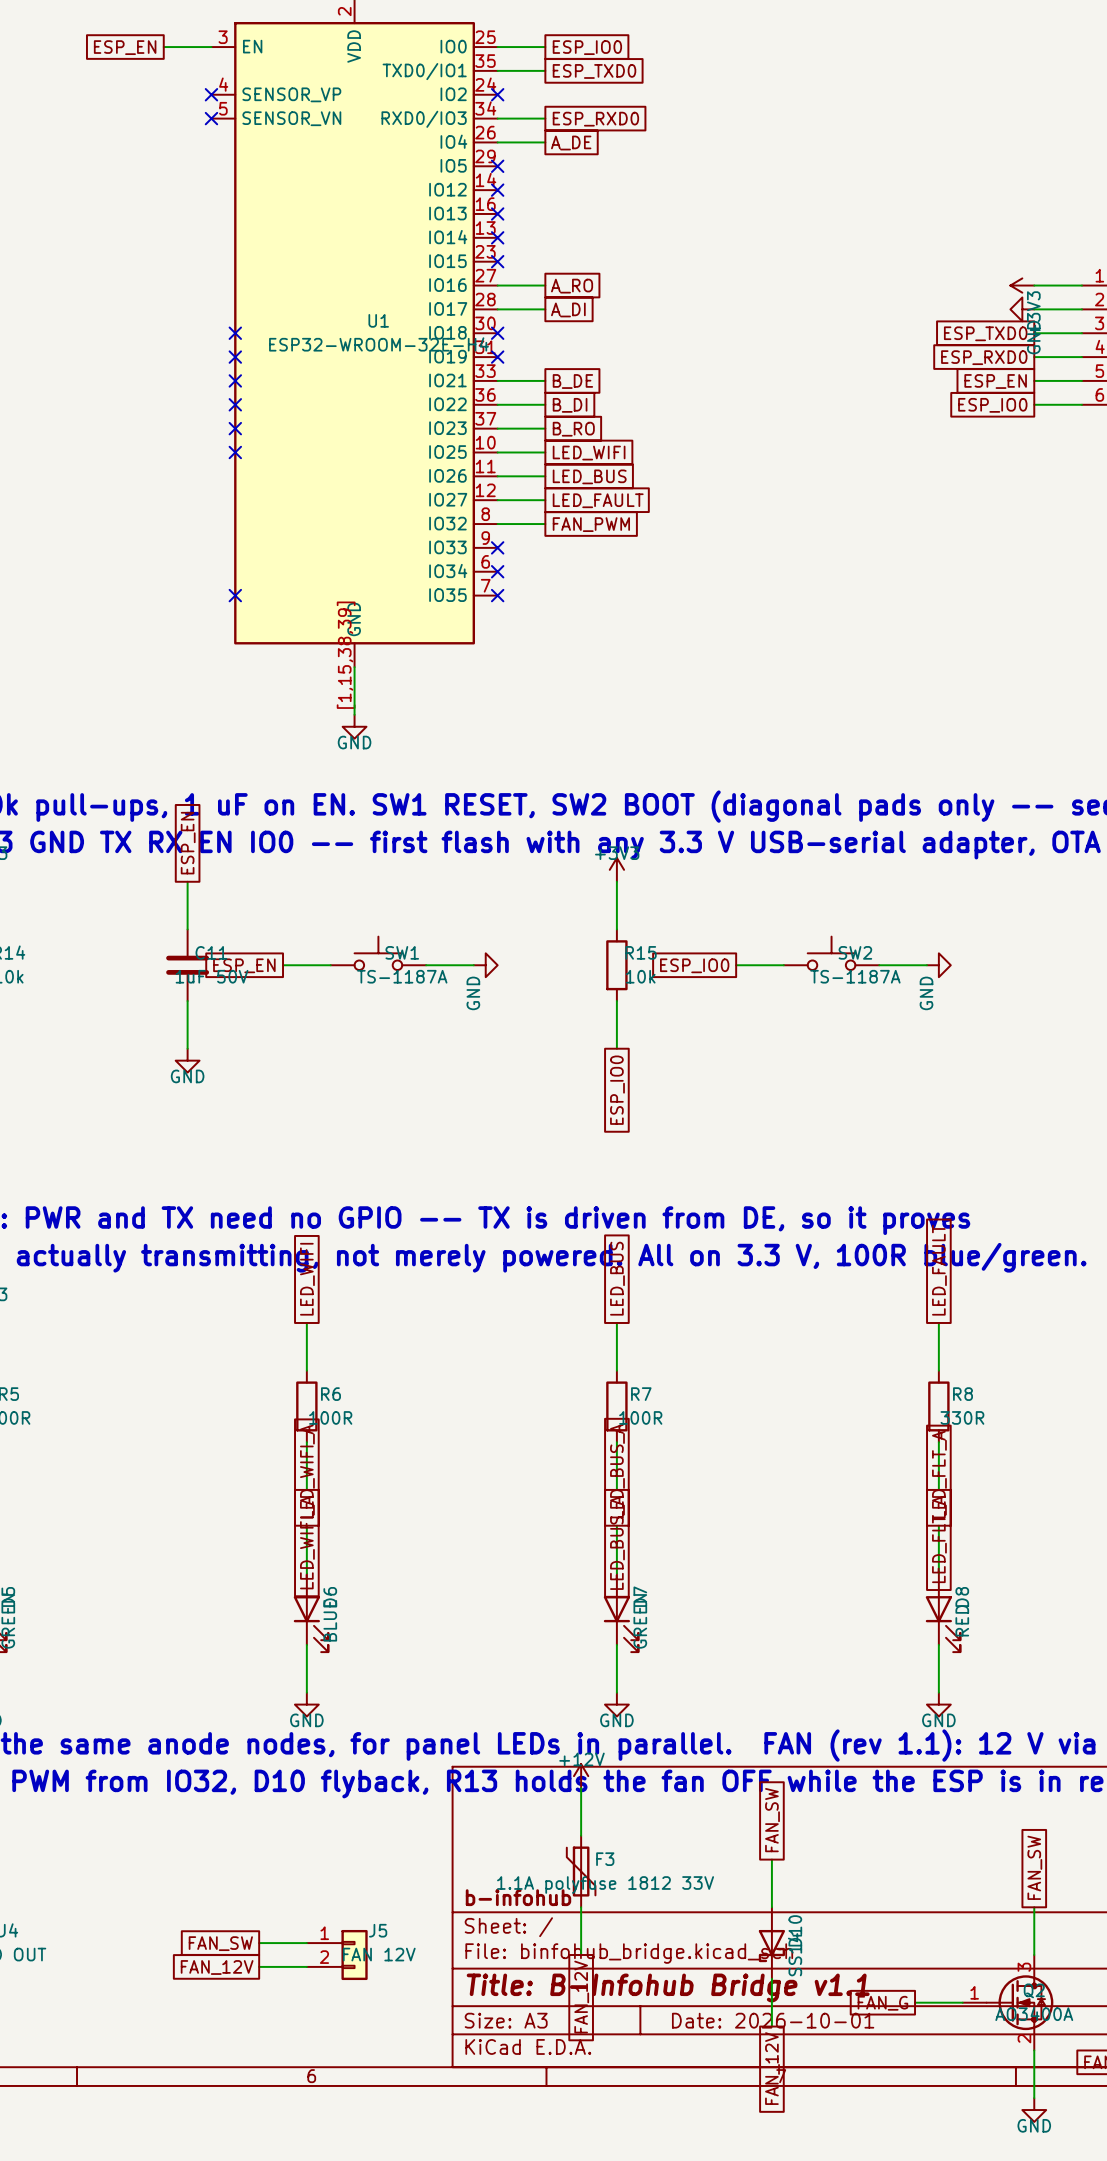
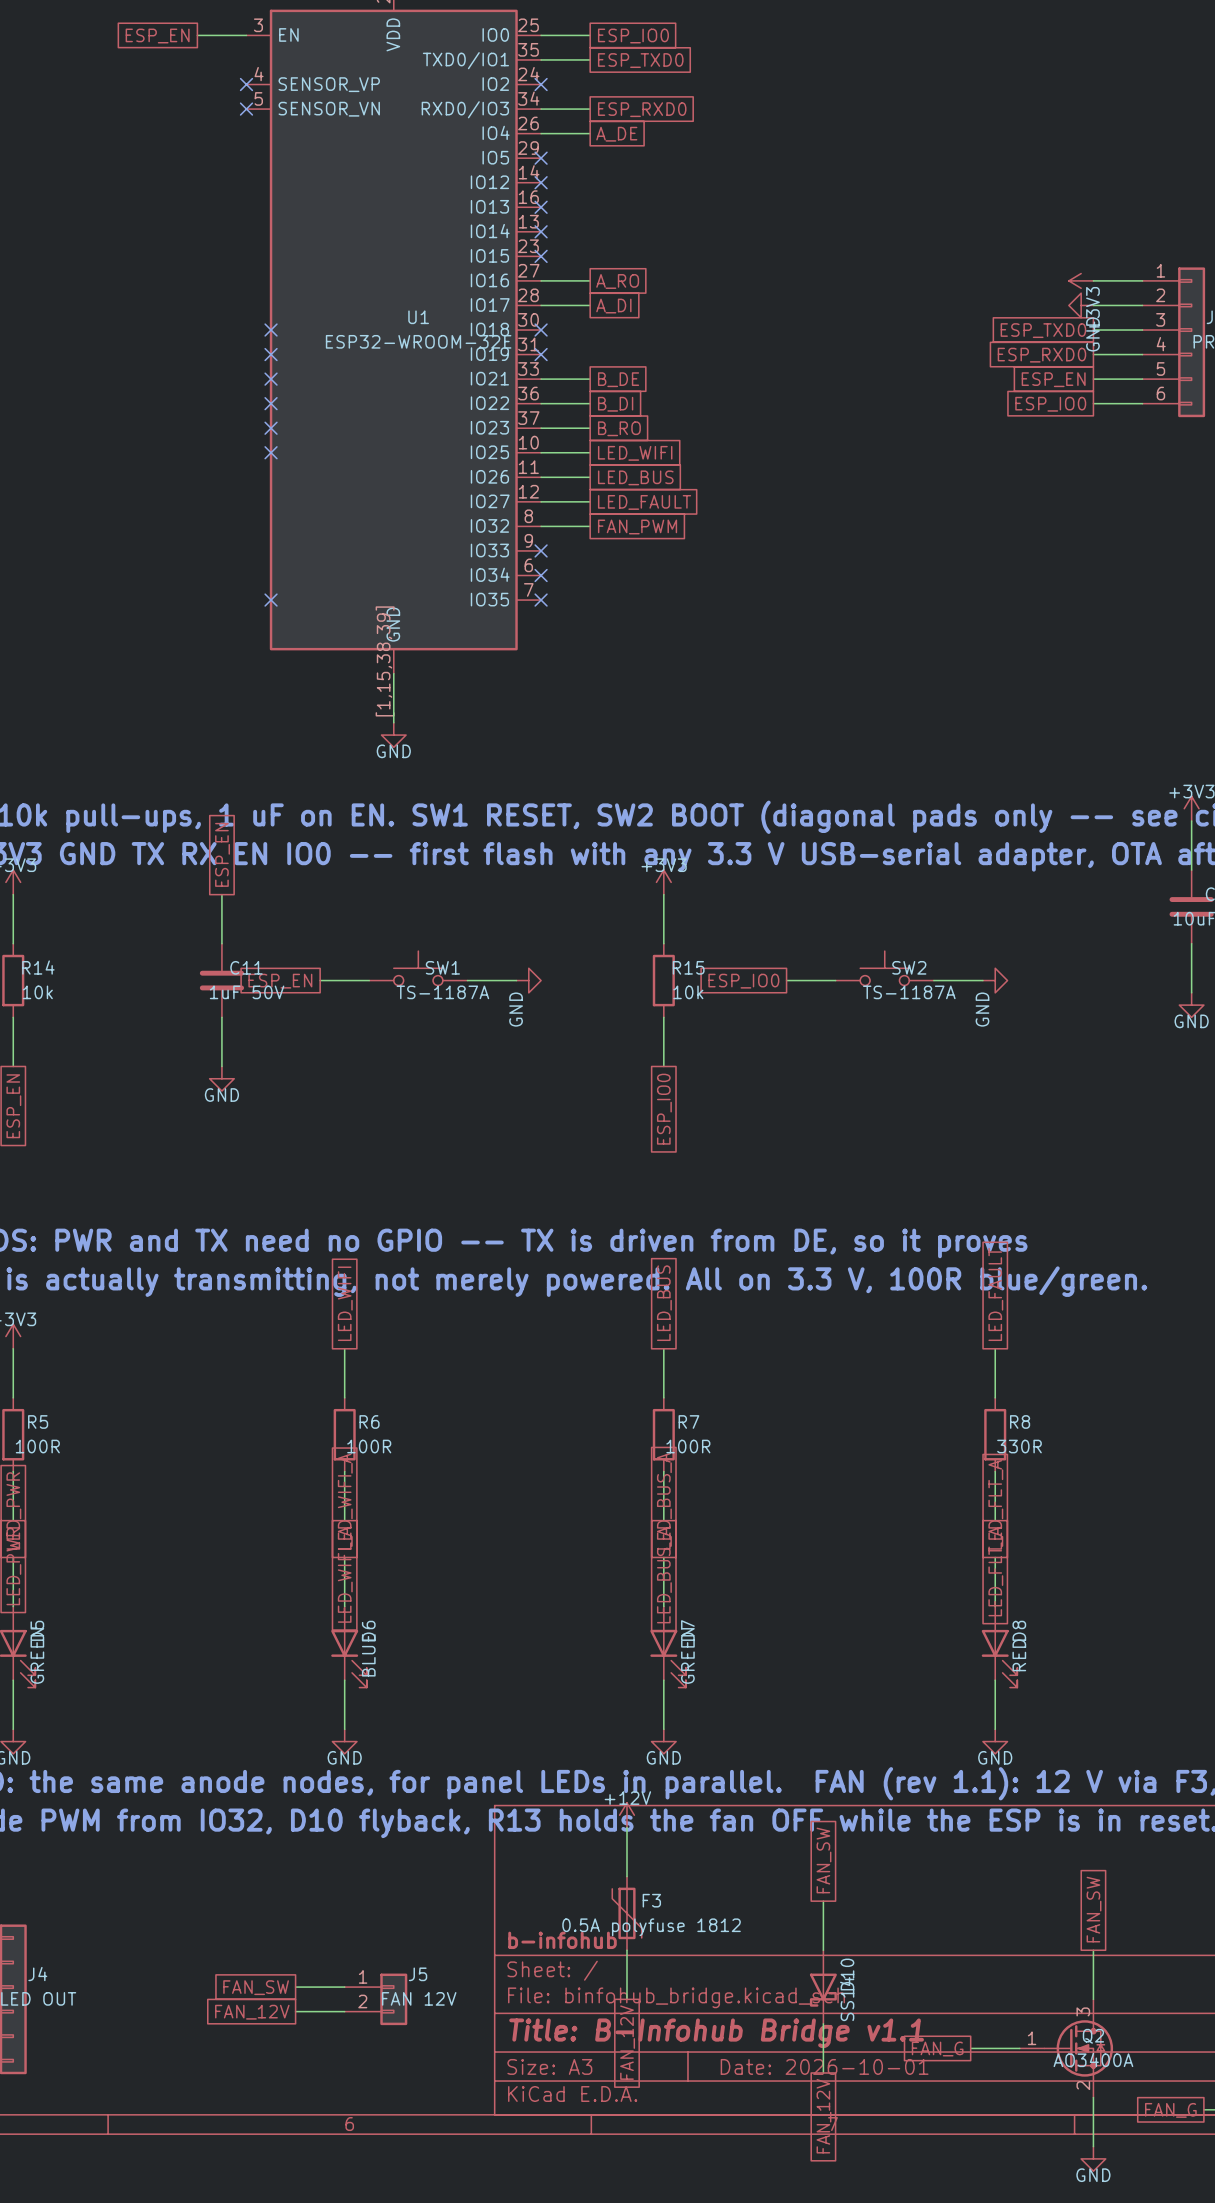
U1 value: ESP32-WROOM-32E-H4 (378, 344) -> ESP32-WROOM-32E (418, 341)
F3 value: 1.1A polyfuse 1812 33V (605, 1884) -> 0.5A polyfuse 1812 (651, 1927)

